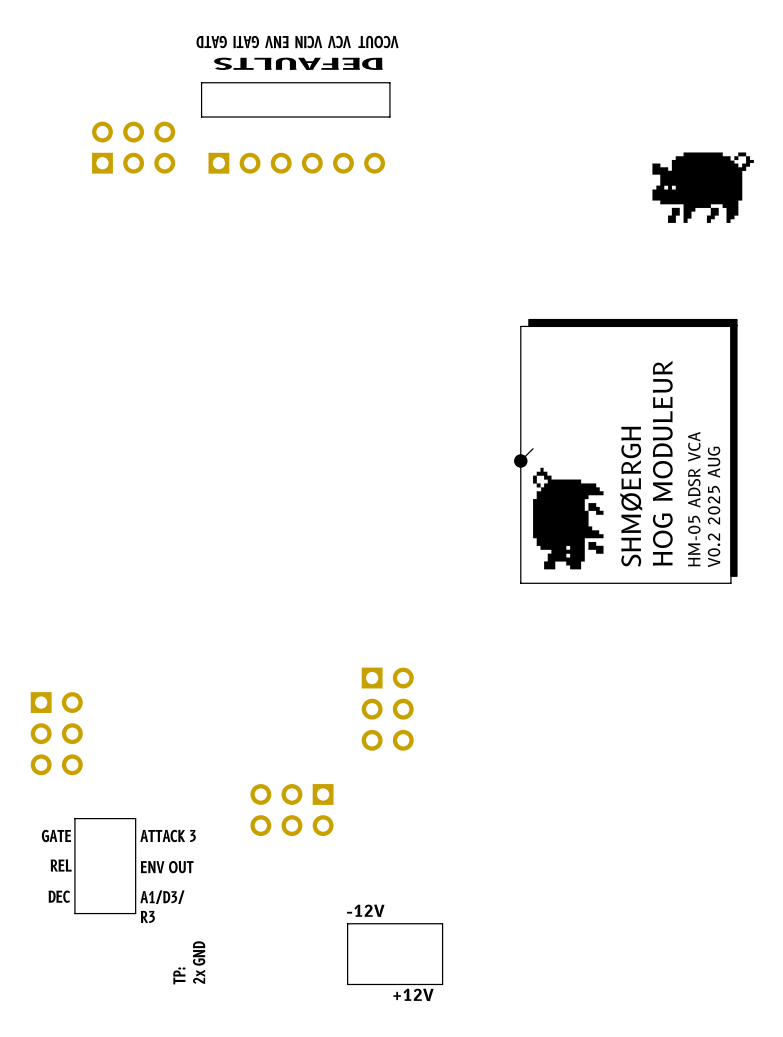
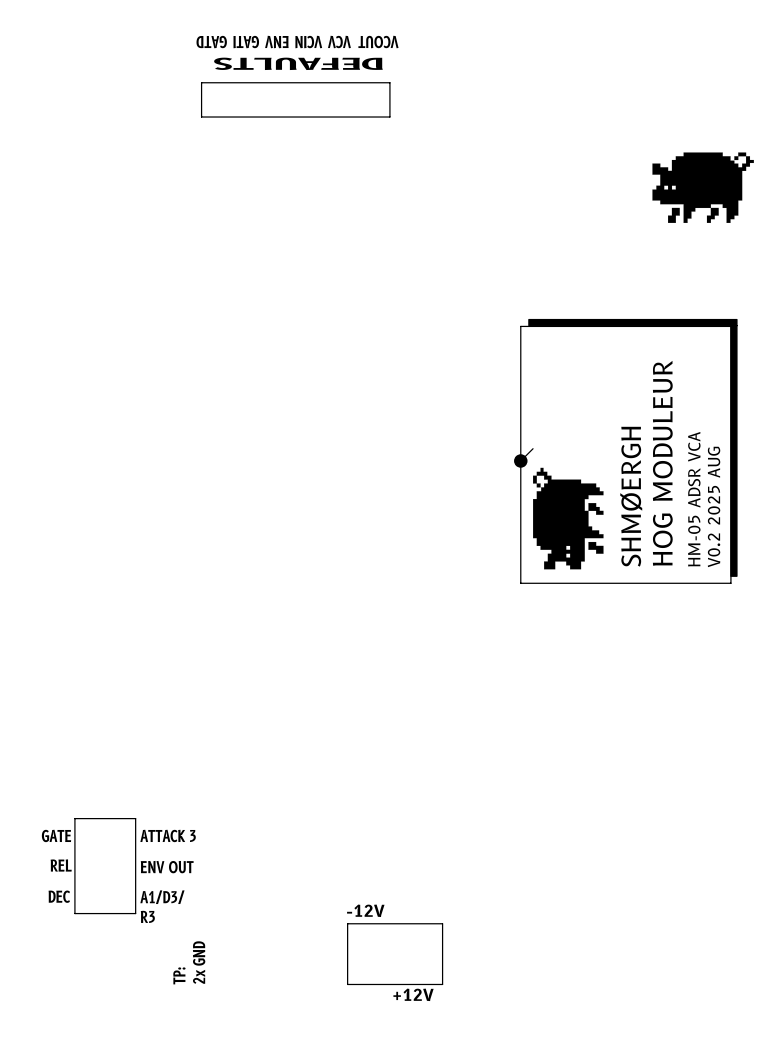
part: (133, 147) -> none
part: (296, 163) -> none
part: (387, 709) -> none
part: (56, 733) -> none
part: (291, 810) -> none

